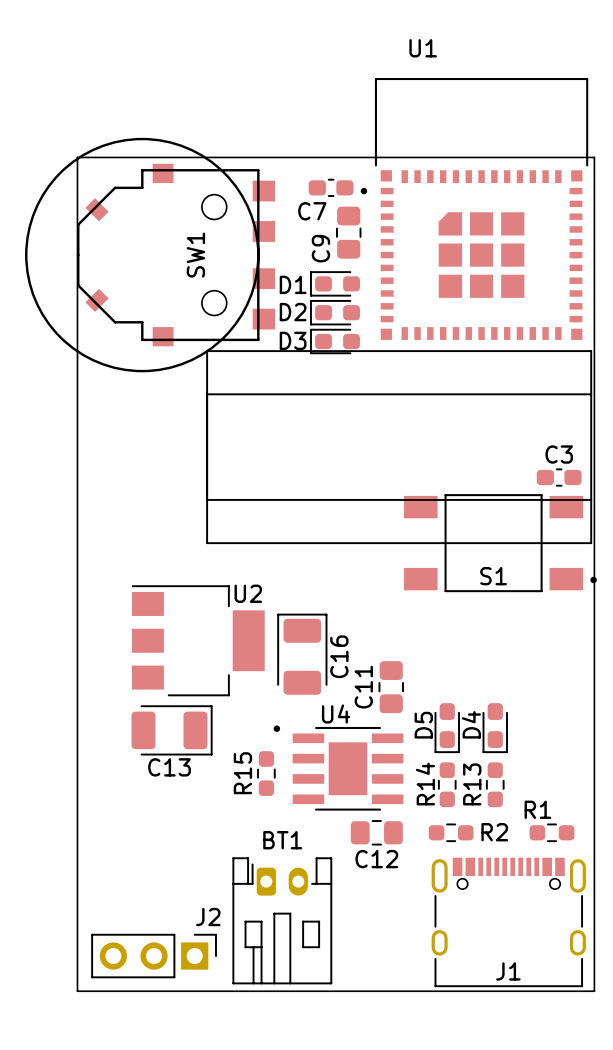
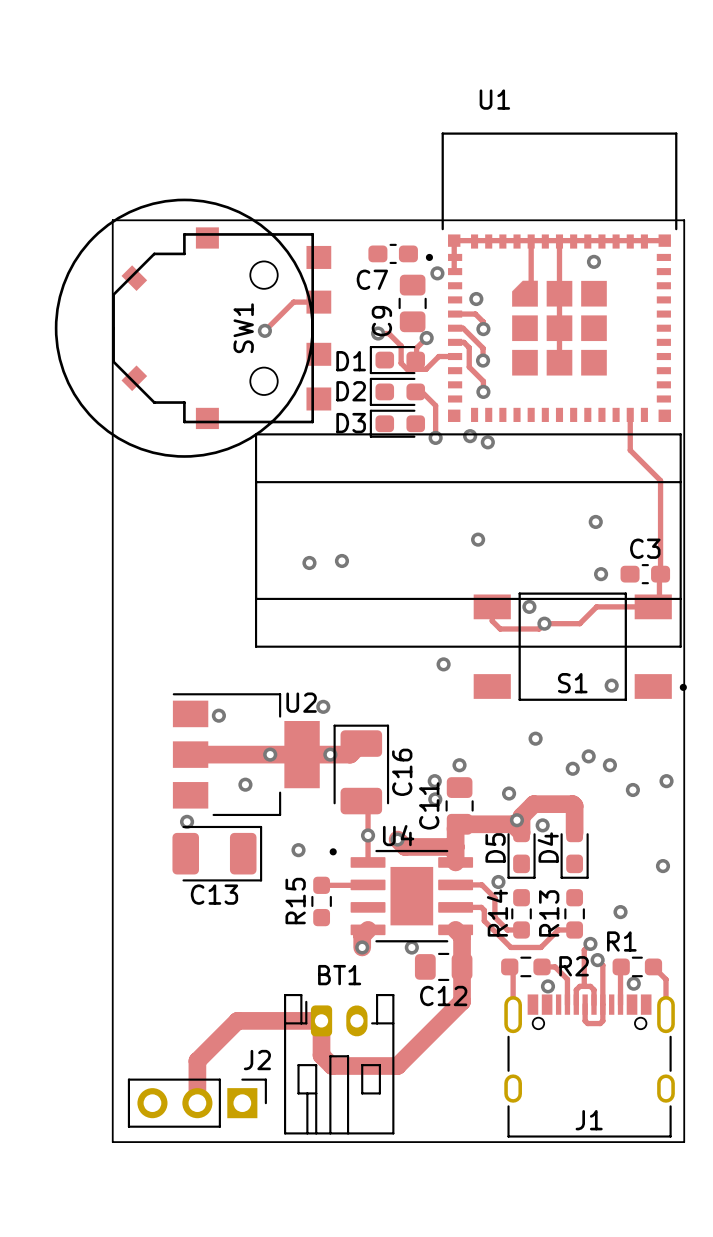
track: none -> (664, 240) (454, 240) (455, 271)
track: none -> (531, 241) (531, 287) (524, 293)
track: none -> (559, 241) (559, 362)
via: none -> (593, 261)
via: none -> (437, 273)
via: none -> (476, 299)
track: none -> (318, 302) (293, 302) (264, 330)
track: none -> (455, 314) (475, 314) (483, 322) (483, 329)
track: none -> (455, 328) (463, 328) (483, 348) (483, 360)
via: none -> (483, 329)
via: none -> (264, 330)
track: none -> (378, 333) (388, 333) (401, 345) (401, 363) (407, 369) (426, 369) (438, 356) (455, 356)
via: none -> (378, 333)
track: none -> (426, 338) (416, 348) (416, 354)
via: none -> (426, 338)
track: none -> (455, 342) (463, 342) (469, 347) (469, 367) (483, 381) (483, 391)
via: none -> (483, 360)
track: none -> (416, 386) (435, 405) (435, 437)
via: none -> (483, 391)
track: none -> (630, 414) (630, 450) (660, 480) (659, 600) (653, 606) (596, 606) (579, 623) (544, 623) (539, 628) (500, 628) (492, 621) (492, 606)
via: none -> (470, 436)
via: none -> (435, 437)
via: none -> (487, 442)
via: none -> (595, 521)
via: none -> (478, 539)
via: none -> (341, 560)
via: none -> (309, 562)
via: none -> (601, 574)
via: none -> (529, 606)
via: none -> (544, 623)
via: none -> (443, 664)
via: none -> (611, 685)
via: none -> (323, 706)
via: none -> (218, 715)
via: none -> (535, 738)
track: none -> (361, 743) (350, 754) (190, 754)
via: none -> (270, 754)
via: none -> (330, 754)
via: none -> (588, 756)
via: none -> (459, 765)
via: none -> (609, 765)
via: none -> (572, 768)
via: none -> (434, 781)
via: none -> (666, 781)
via: none -> (245, 784)
via: none -> (632, 790)
via: none -> (509, 793)
via: none -> (435, 799)
track: none -> (361, 801) (368, 807) (368, 862)
via: none -> (516, 820)
via: none -> (187, 821)
via: none -> (542, 825)
track: none -> (574, 832) (574, 806) (572, 804) (533, 804) (521, 816) (521, 832) (512, 824) (459, 824) (455, 828) (455, 862)
via: none -> (368, 835)
track: none -> (397, 839) (405, 846) (455, 846)
via: none -> (397, 839)
via: none -> (298, 850)
via: none -> (662, 866)
via: none -> (498, 882)
track: none -> (368, 884) (321, 885)
track: none -> (455, 884) (481, 884) (494, 897) (494, 917) (507, 929) (521, 929)
track: none -> (455, 907) (481, 907) (484, 910) (484, 920) (510, 947) (540, 947) (558, 929) (574, 929)
via: none -> (620, 912)
track: none -> (368, 929) (362, 935) (362, 947)
track: none -> (455, 929) (462, 936) (462, 1001) (397, 1066) (332, 1066) (321, 1055) (321, 1020) (237, 1020) (197, 1060) (197, 1103)
track: none -> (590, 943) (584, 950) (585, 986)
via: none -> (590, 943)
via: none -> (362, 947)
via: none -> (411, 947)
track: none -> (597, 960) (602, 965) (602, 1020) (600, 1023) (587, 1023) (585, 1020) (585, 1004)
via: none -> (597, 960)
track: none -> (509, 966) (513, 970) (513, 1014)
track: none -> (542, 966) (555, 966) (567, 979) (567, 1004)
track: none -> (621, 966) (620, 1004)
track: none -> (653, 966) (666, 979) (666, 1014)
via: none -> (633, 983)
via: none -> (547, 986)
track: none -> (576, 1004) (576, 989) (579, 986) (590, 986) (593, 989) (593, 1004)

